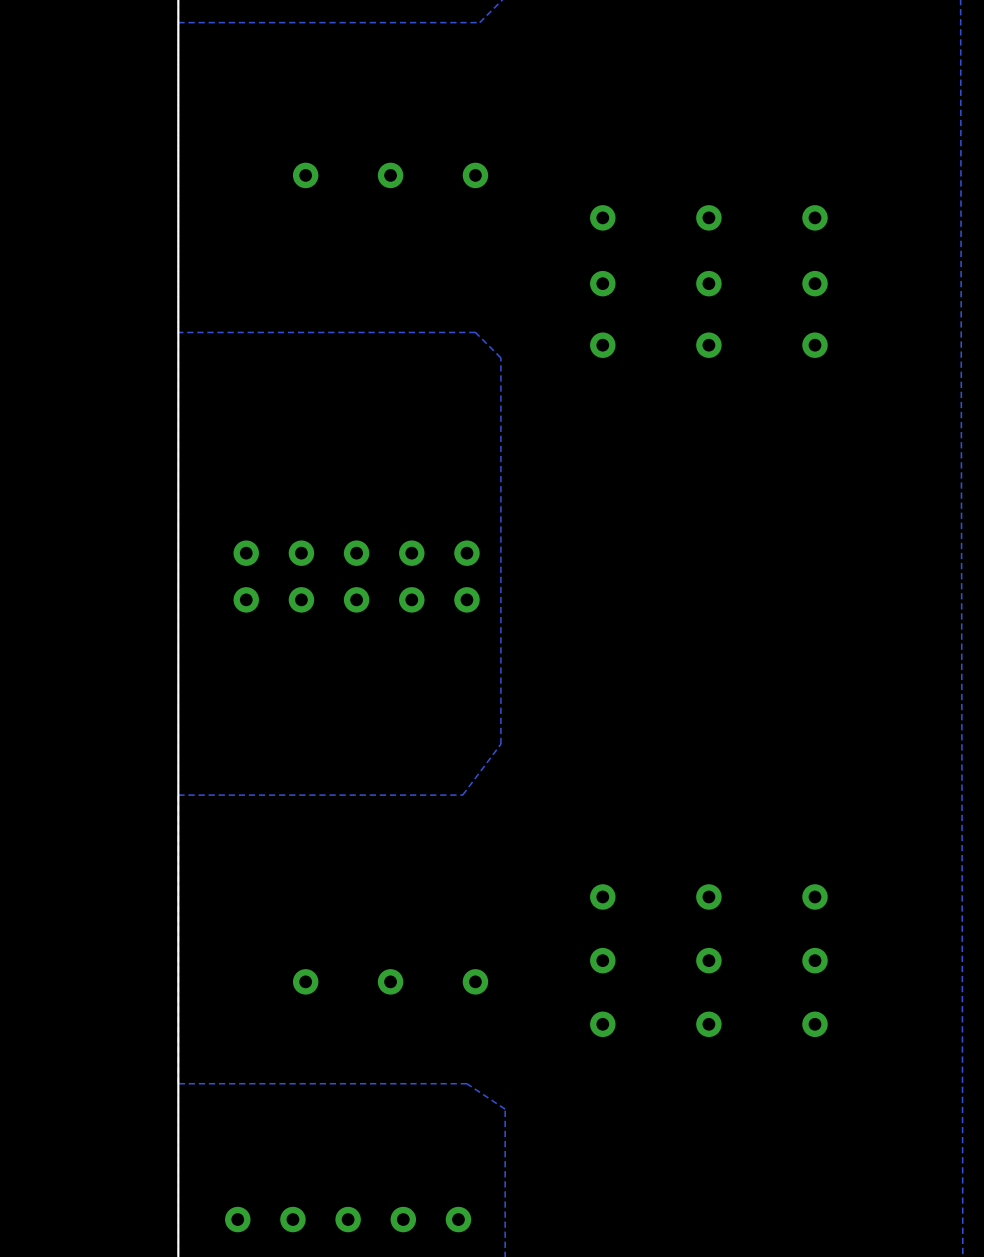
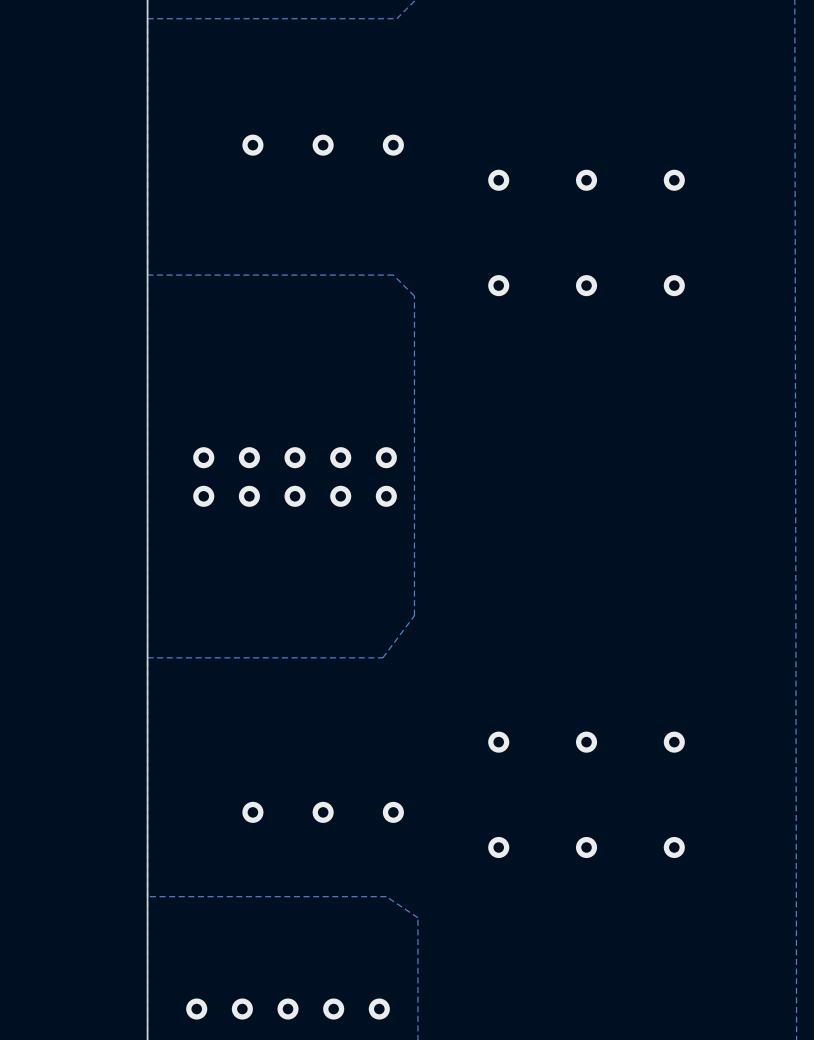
via: (602, 283) -> none
via: (708, 283) -> none
via: (815, 283) -> none
via: (602, 960) -> none
via: (708, 960) -> none
via: (815, 960) -> none

